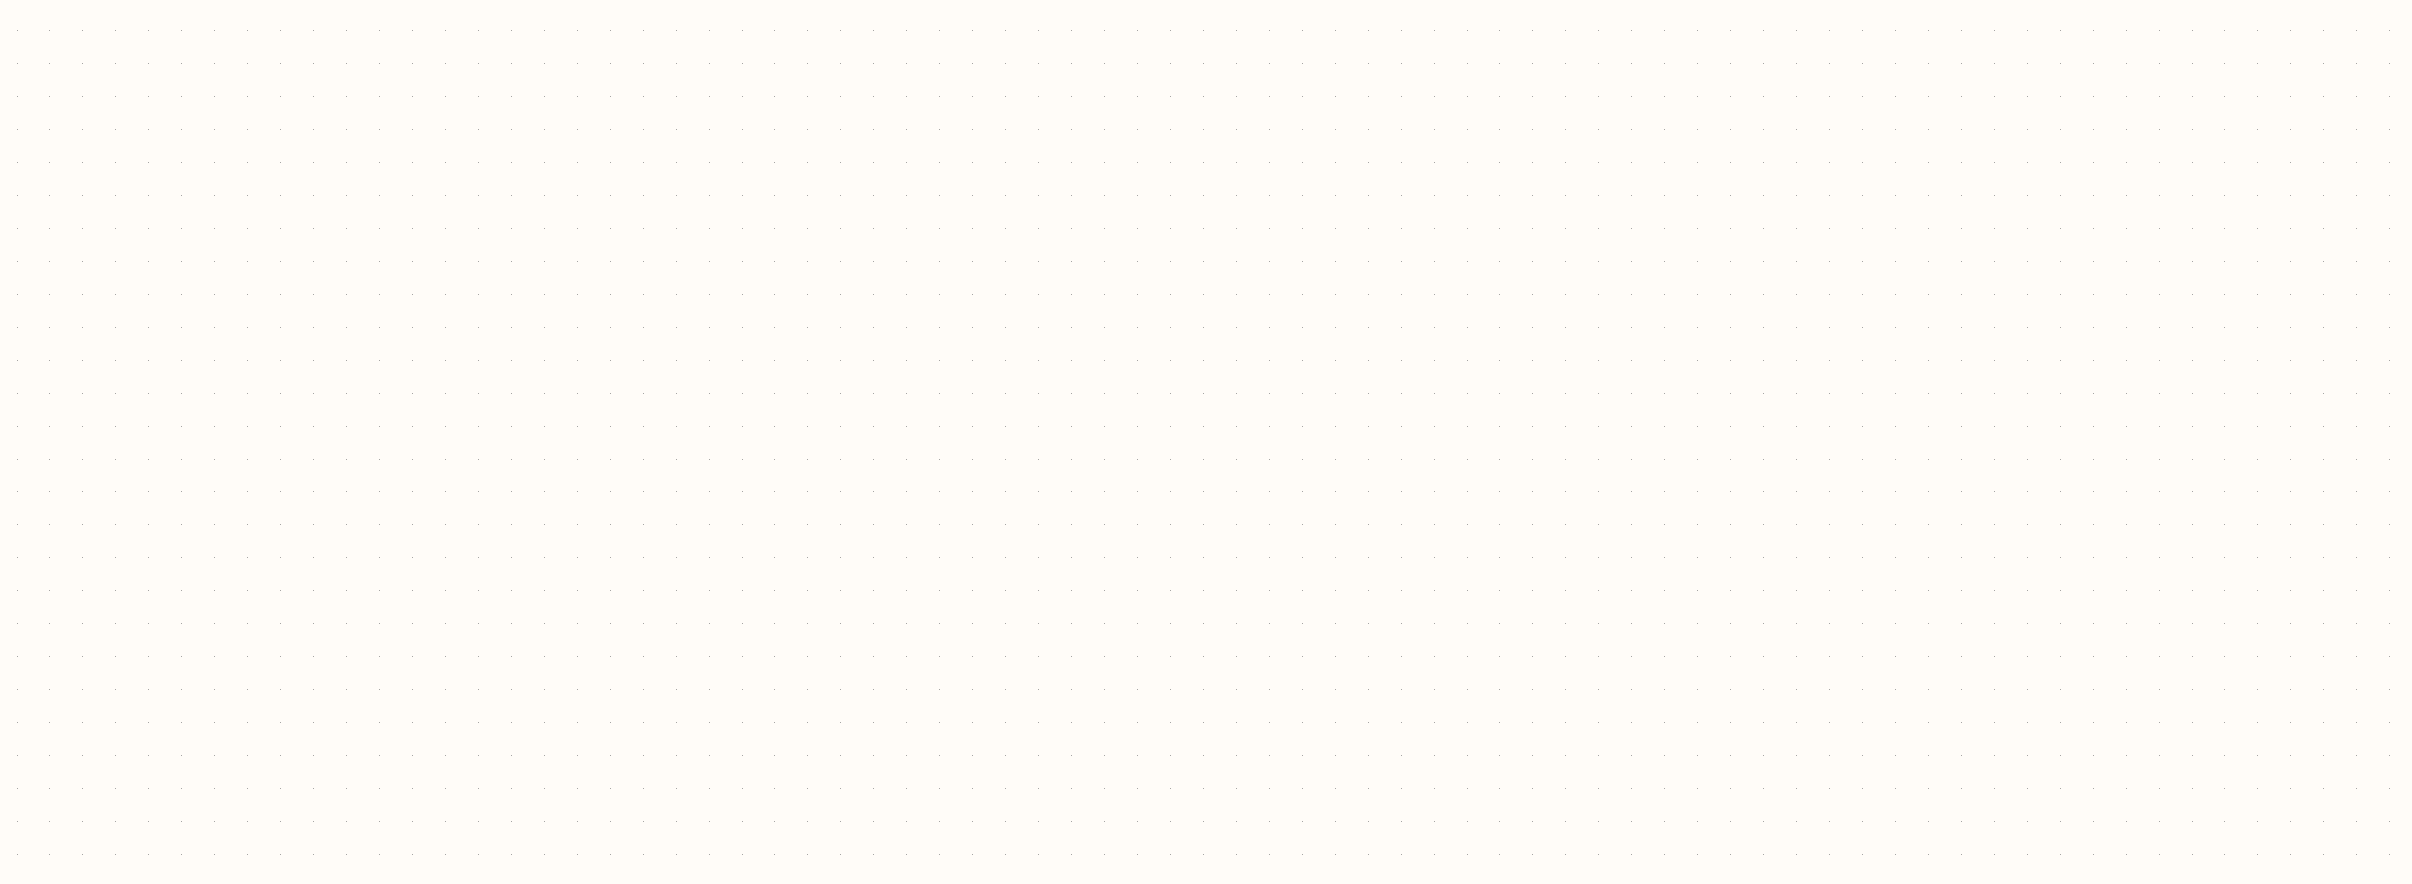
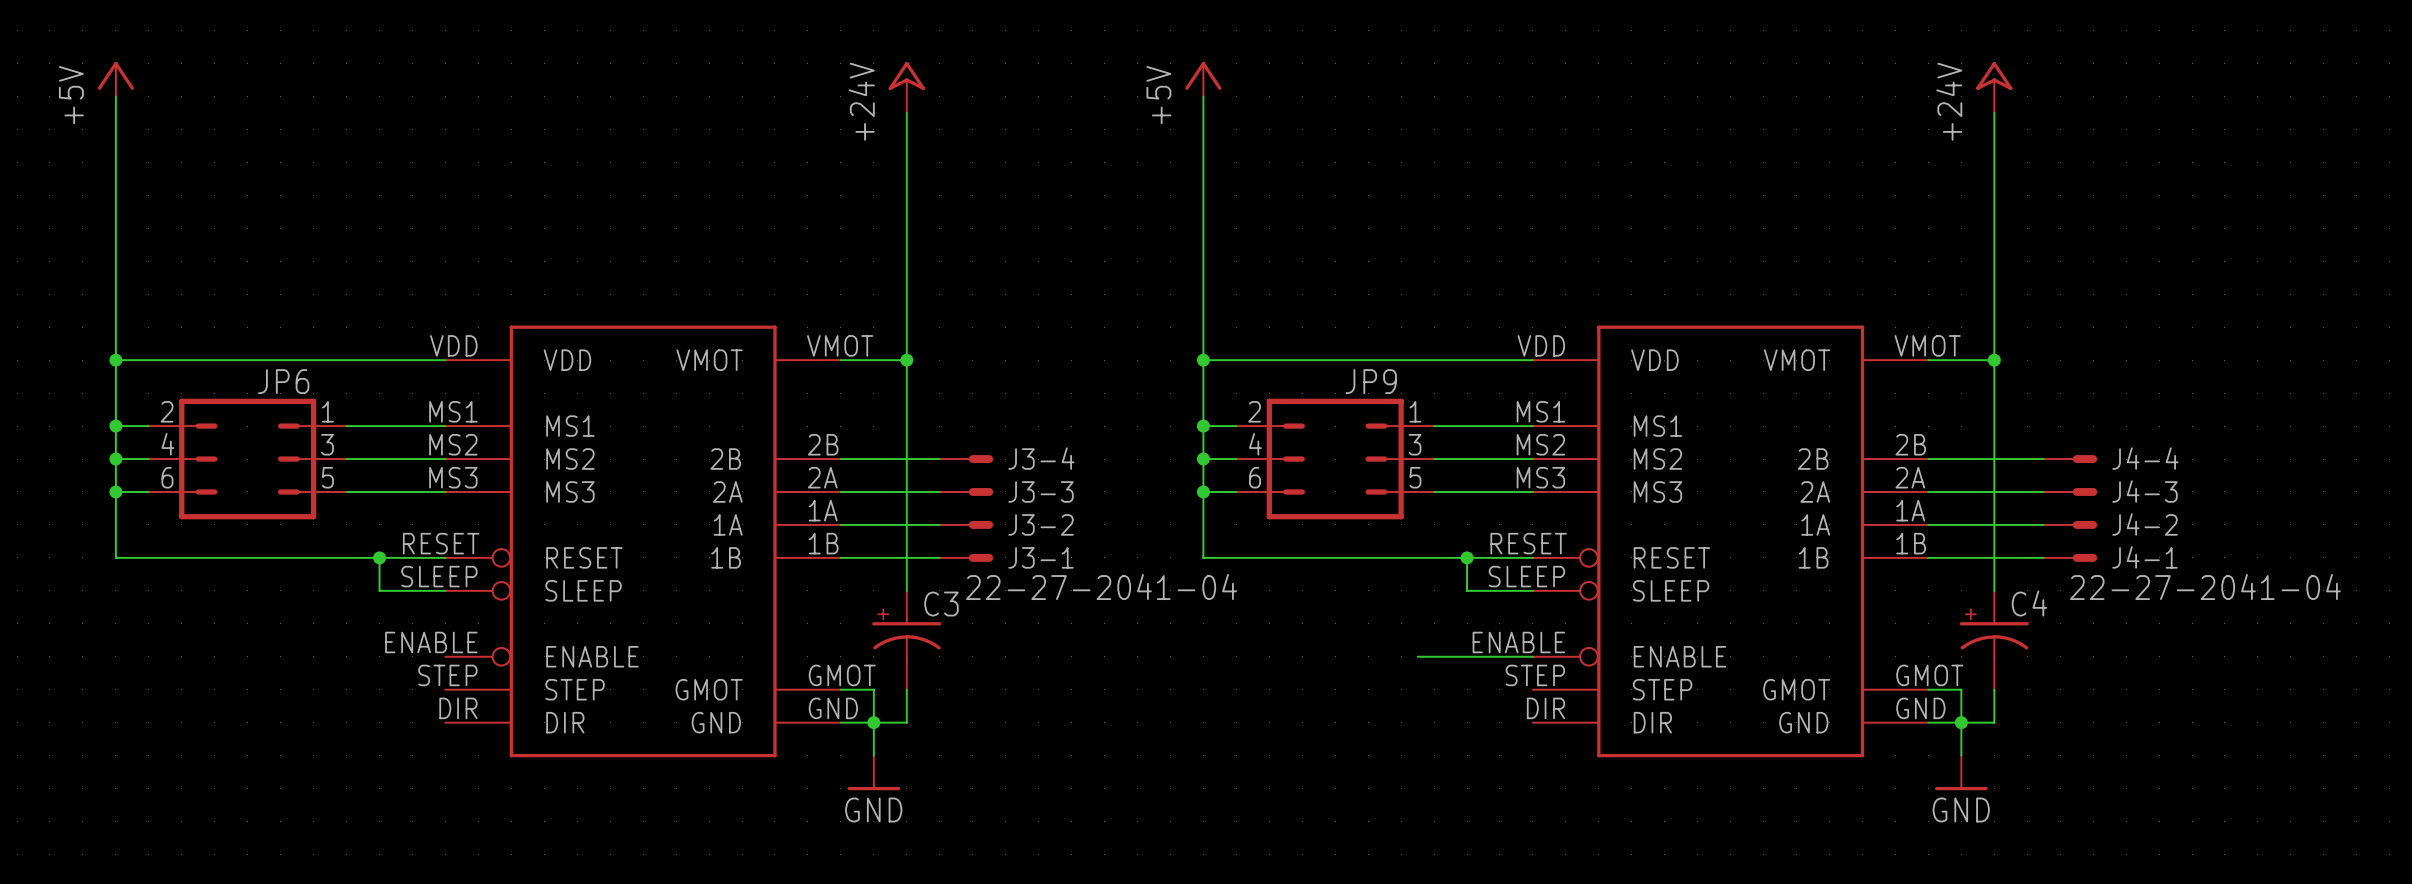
power symbol: none -> +5V (115, 79)
power symbol: none -> +5V (1203, 79)
power symbol: none -> +24V (906, 87)
power symbol: none -> +24V (1994, 87)
wire: none -> (115, 96) (115, 557) (445, 557)
wire: none -> (1203, 96) (1203, 557) (1532, 557)
wire: none -> (906, 113) (906, 590)
wire: none -> (1994, 113) (1994, 590)
wire: none -> (115, 360) (445, 360)
junction: none -> (115, 360)
wire: none -> (840, 360) (906, 360)
junction: none -> (906, 360)
wire: none -> (1203, 360) (1532, 360)
junction: none -> (1203, 360)
wire: none -> (1928, 360) (1994, 360)
junction: none -> (1994, 360)
wire: none -> (115, 426) (148, 426)
junction: none -> (115, 426)
wire: none -> (346, 426) (445, 426)
wire: none -> (1203, 426) (1236, 426)
junction: none -> (1203, 426)
wire: none -> (1434, 426) (1532, 426)
wire: none -> (115, 459) (148, 459)
junction: none -> (115, 459)
JP6: none -> (247, 459)
wire: none -> (346, 459) (445, 459)
wire: none -> (840, 459) (939, 459)
J3-4: none -> (966, 459)
wire: none -> (1203, 459) (1236, 459)
junction: none -> (1203, 459)
JP9: none -> (1335, 459)
wire: none -> (1434, 459) (1532, 459)
wire: none -> (1928, 459) (2043, 459)
J4-4: none -> (2070, 459)
wire: none -> (115, 491) (148, 491)
junction: none -> (115, 491)
wire: none -> (346, 491) (445, 491)
wire: none -> (840, 491) (939, 491)
J3-3: none -> (966, 491)
wire: none -> (1203, 491) (1236, 491)
junction: none -> (1203, 491)
wire: none -> (1434, 491) (1532, 491)
wire: none -> (1928, 491) (2043, 491)
J4-3: none -> (2070, 491)
wire: none -> (840, 524) (939, 524)
J3-2: none -> (966, 524)
wire: none -> (1928, 524) (2043, 524)
J4-2: none -> (2070, 524)
part: none -> (643, 541)
part: none -> (1730, 541)
wire: none -> (379, 557) (379, 590) (445, 590)
junction: none -> (379, 557)
wire: none -> (840, 557) (939, 557)
J3-1: none -> 22-27-2041-04 (966, 557)
wire: none -> (1467, 557) (1467, 590) (1532, 590)
junction: none -> (1467, 557)
wire: none -> (1928, 557) (2043, 557)
J4-1: none -> 22-27-2041-04 (2070, 557)
C3: none -> (906, 640)
C4: none -> (1994, 640)
wire: none -> (1417, 656) (1532, 656)
wire: none -> (840, 689) (873, 689) (873, 755)
wire: none -> (906, 689) (906, 722) (840, 722)
wire: none -> (1928, 689) (1961, 689) (1961, 755)
wire: none -> (1994, 689) (1994, 722) (1928, 722)
junction: none -> (873, 722)
junction: none -> (1961, 722)
power symbol: none -> GND (873, 772)
power symbol: none -> GND (1961, 772)

